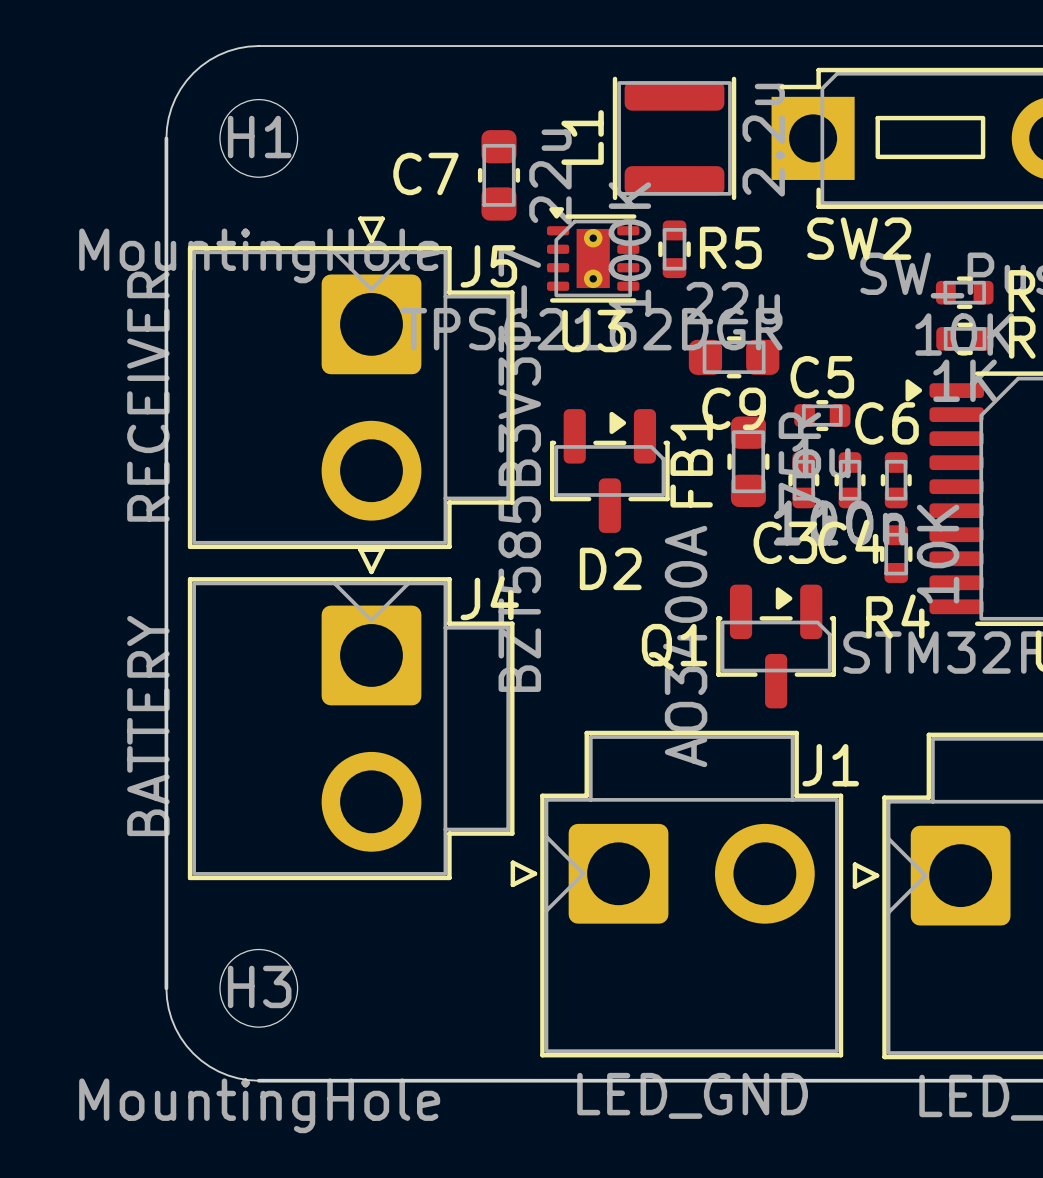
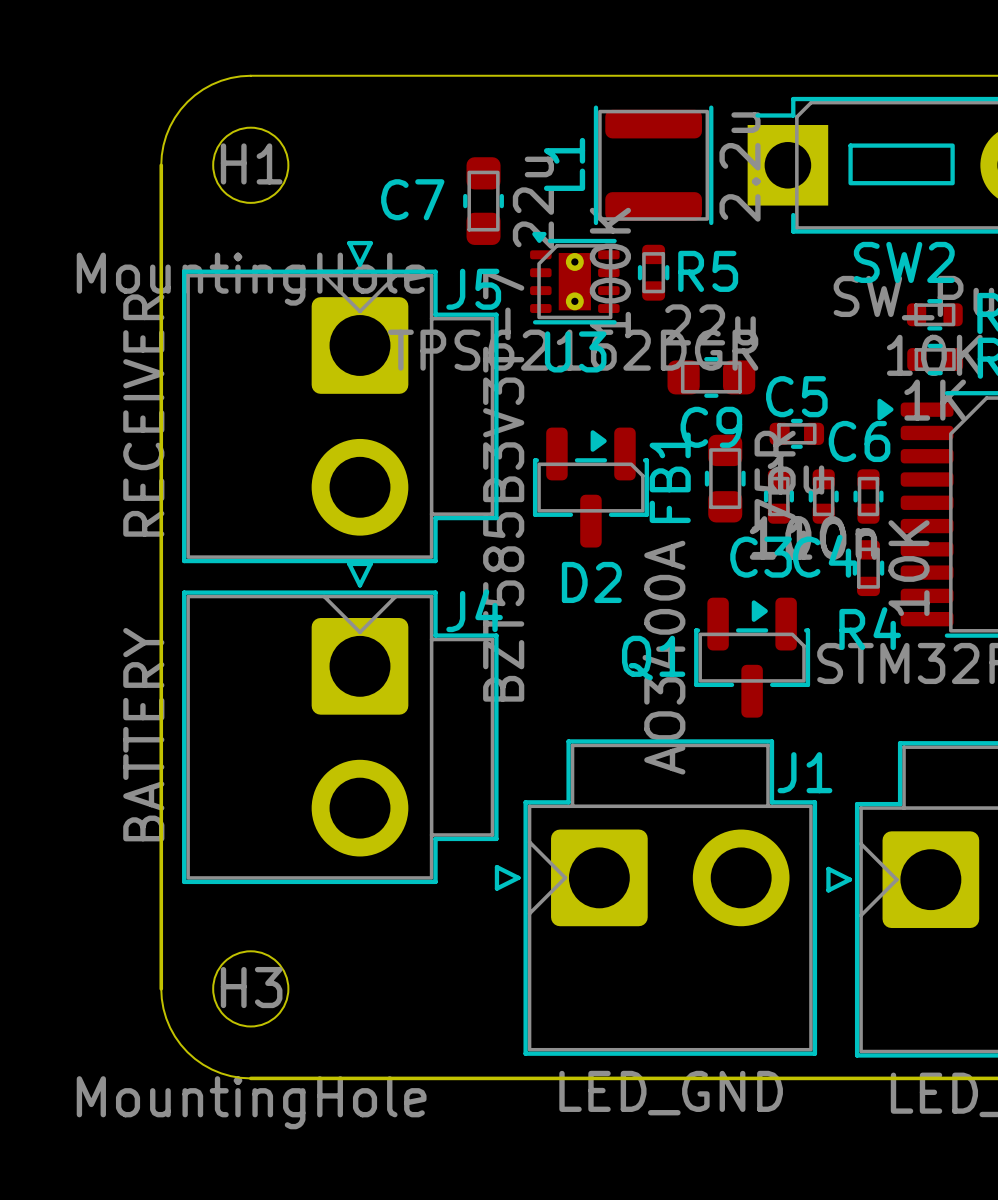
SW2 name position: SW2 (859, 238) -> SW2 (904, 262)

